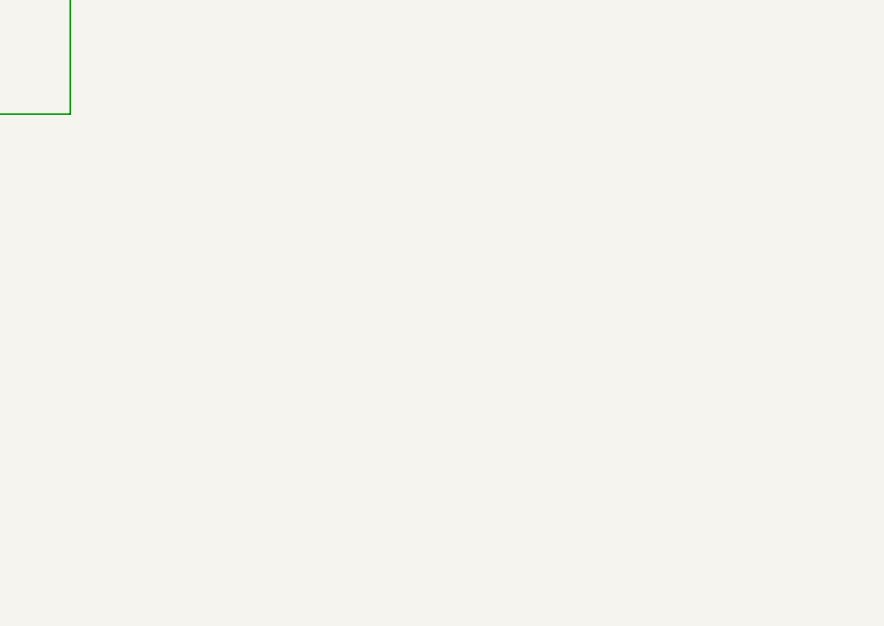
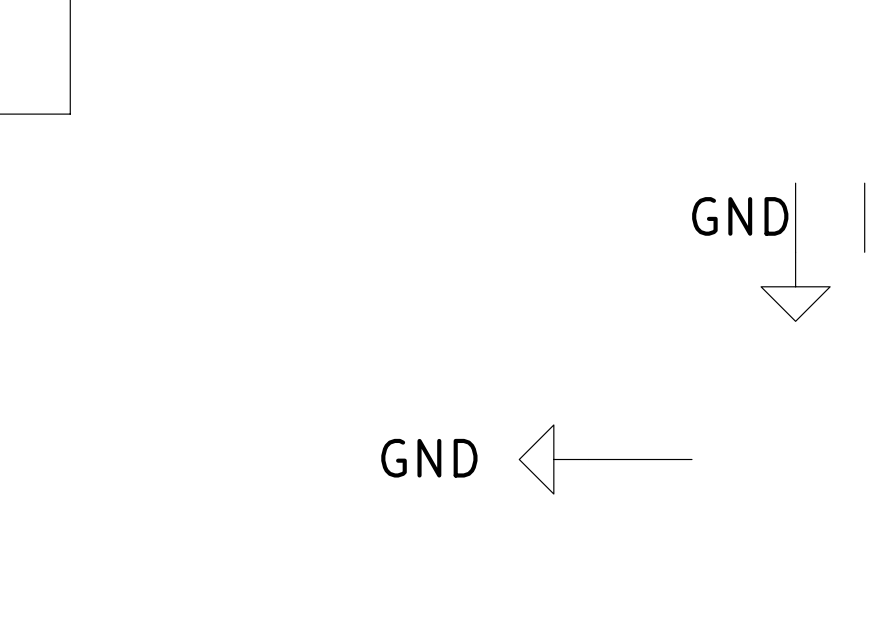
wire: none -> (795, 183) (795, 252)
wire: none -> (864, 183) (864, 252)
power symbol: none -> GND (795, 286)
power symbol: none -> GND (553, 459)
wire: none -> (588, 459) (691, 459)

